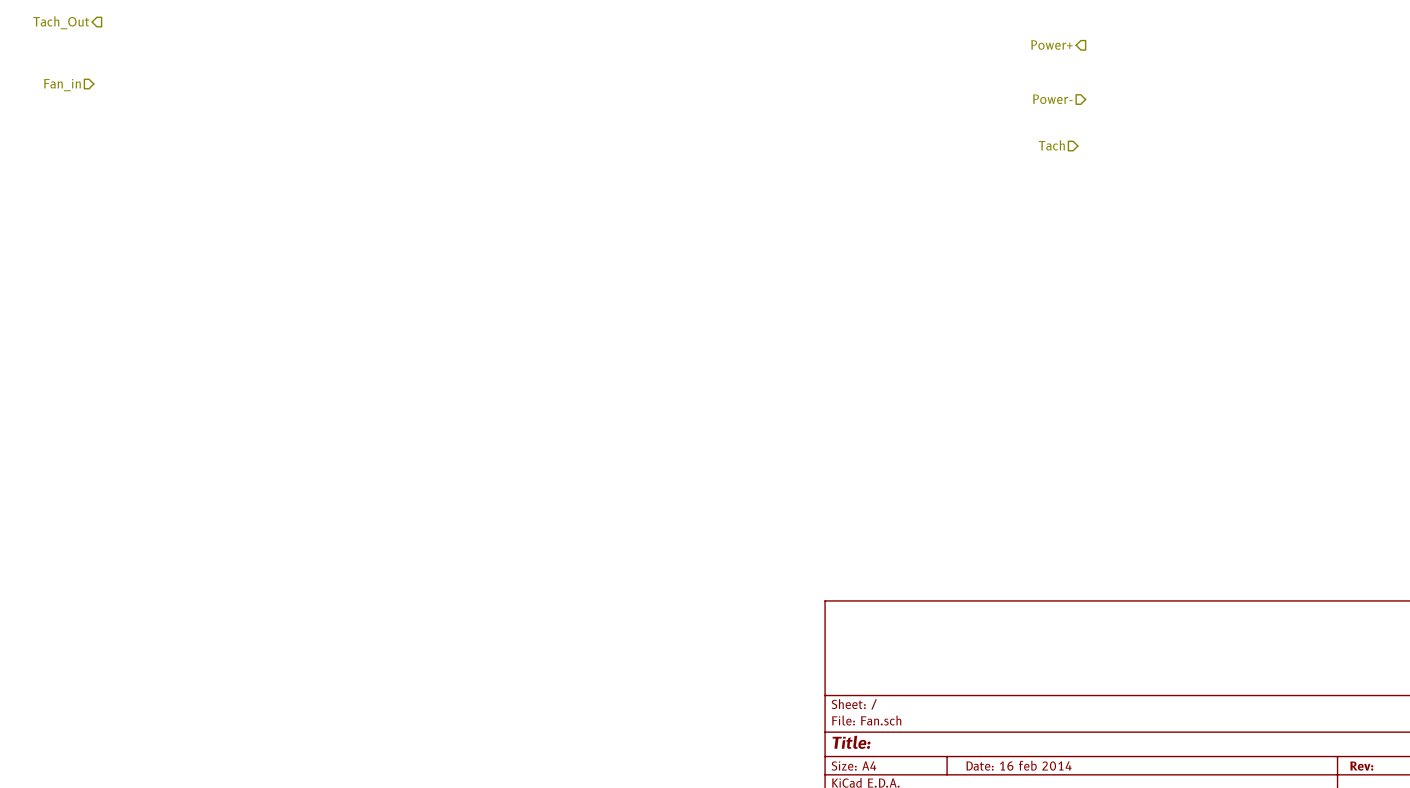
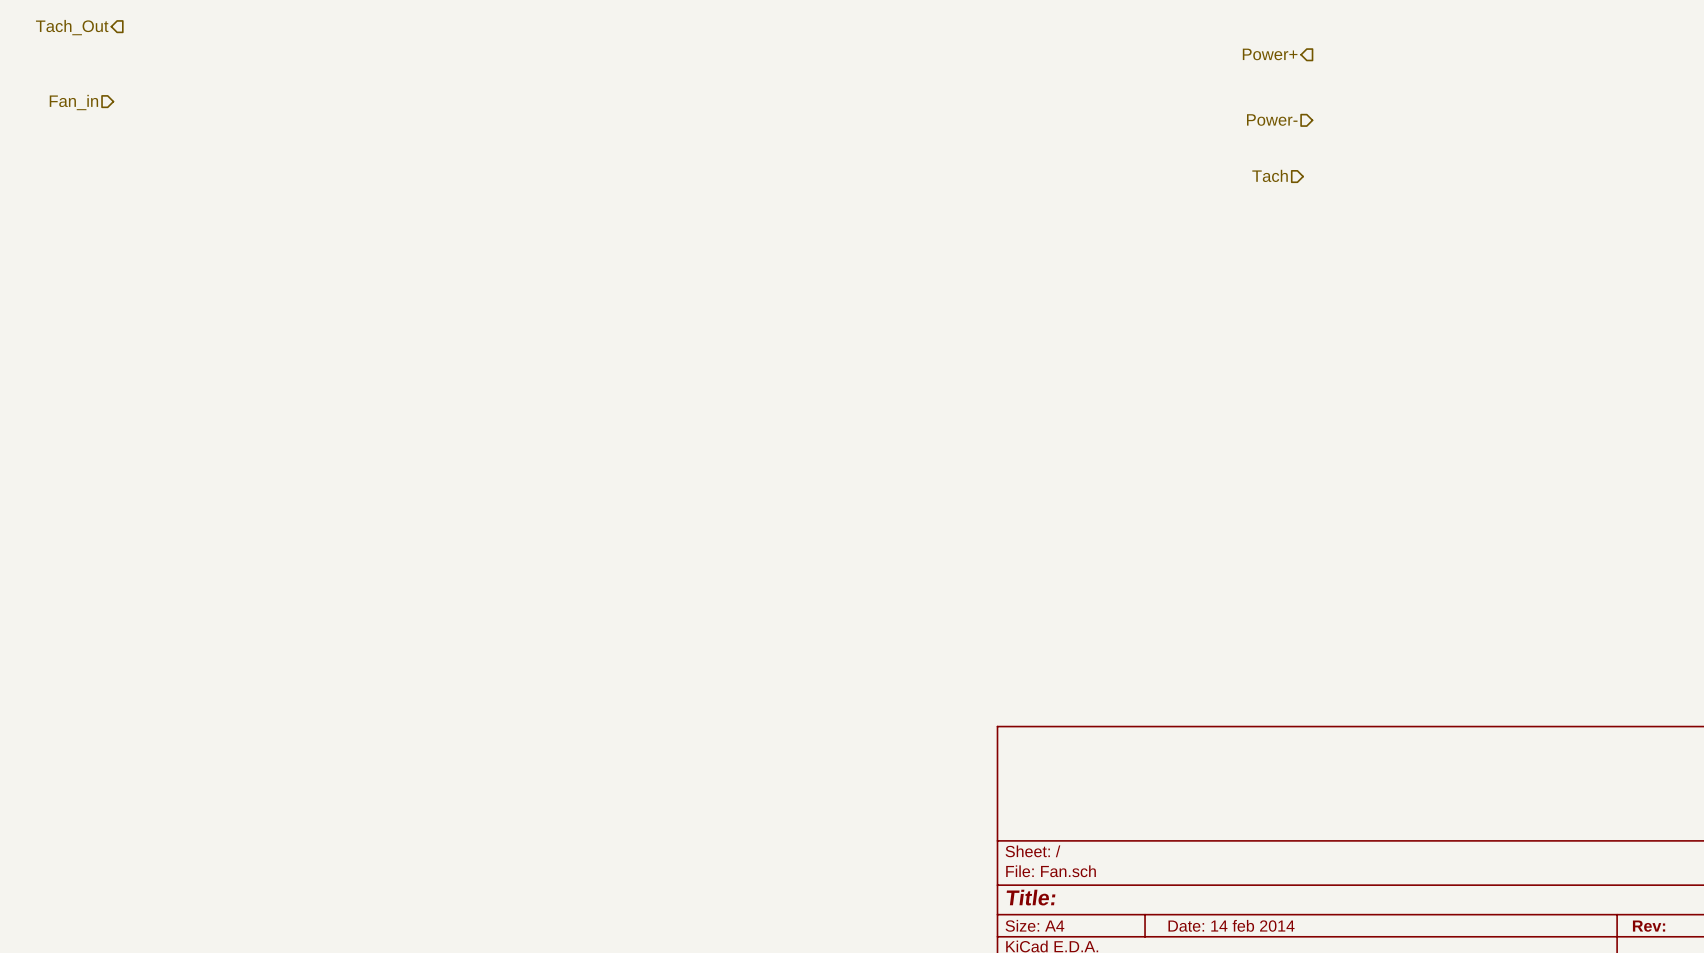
title block: Date: 16 feb 2014 (1019, 765) -> Date: 14 feb 2014 (1231, 925)

